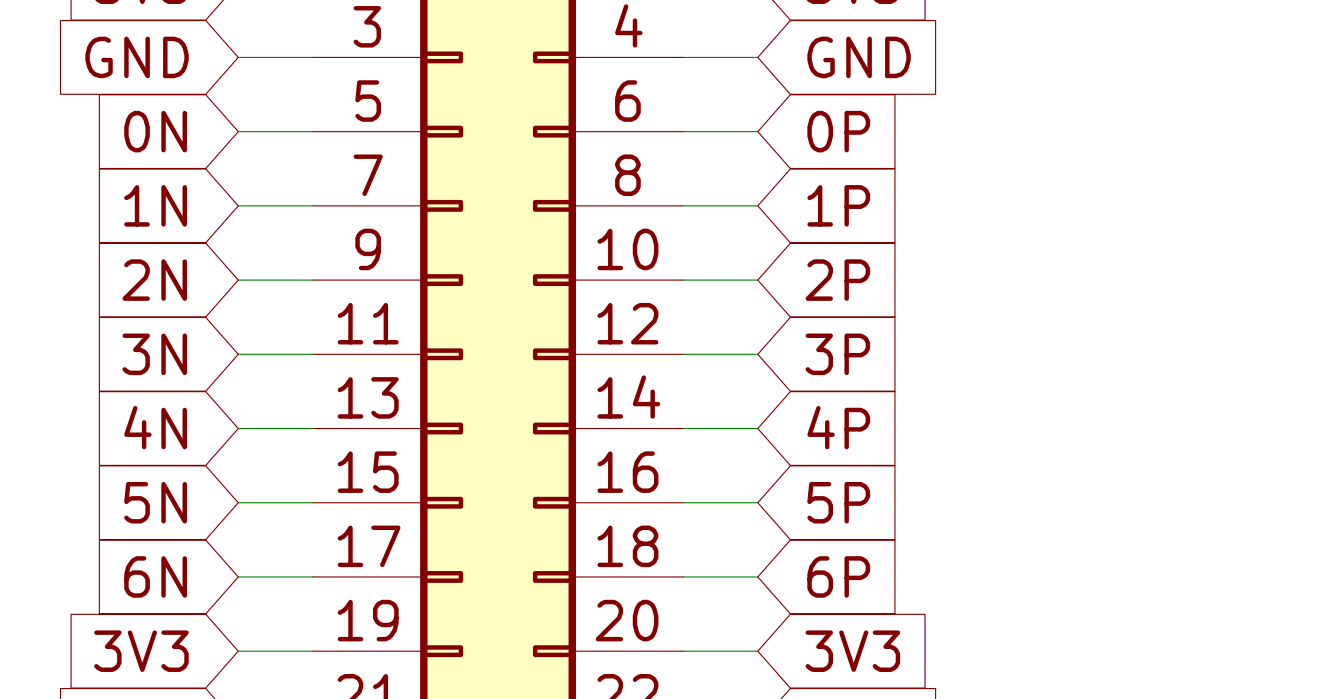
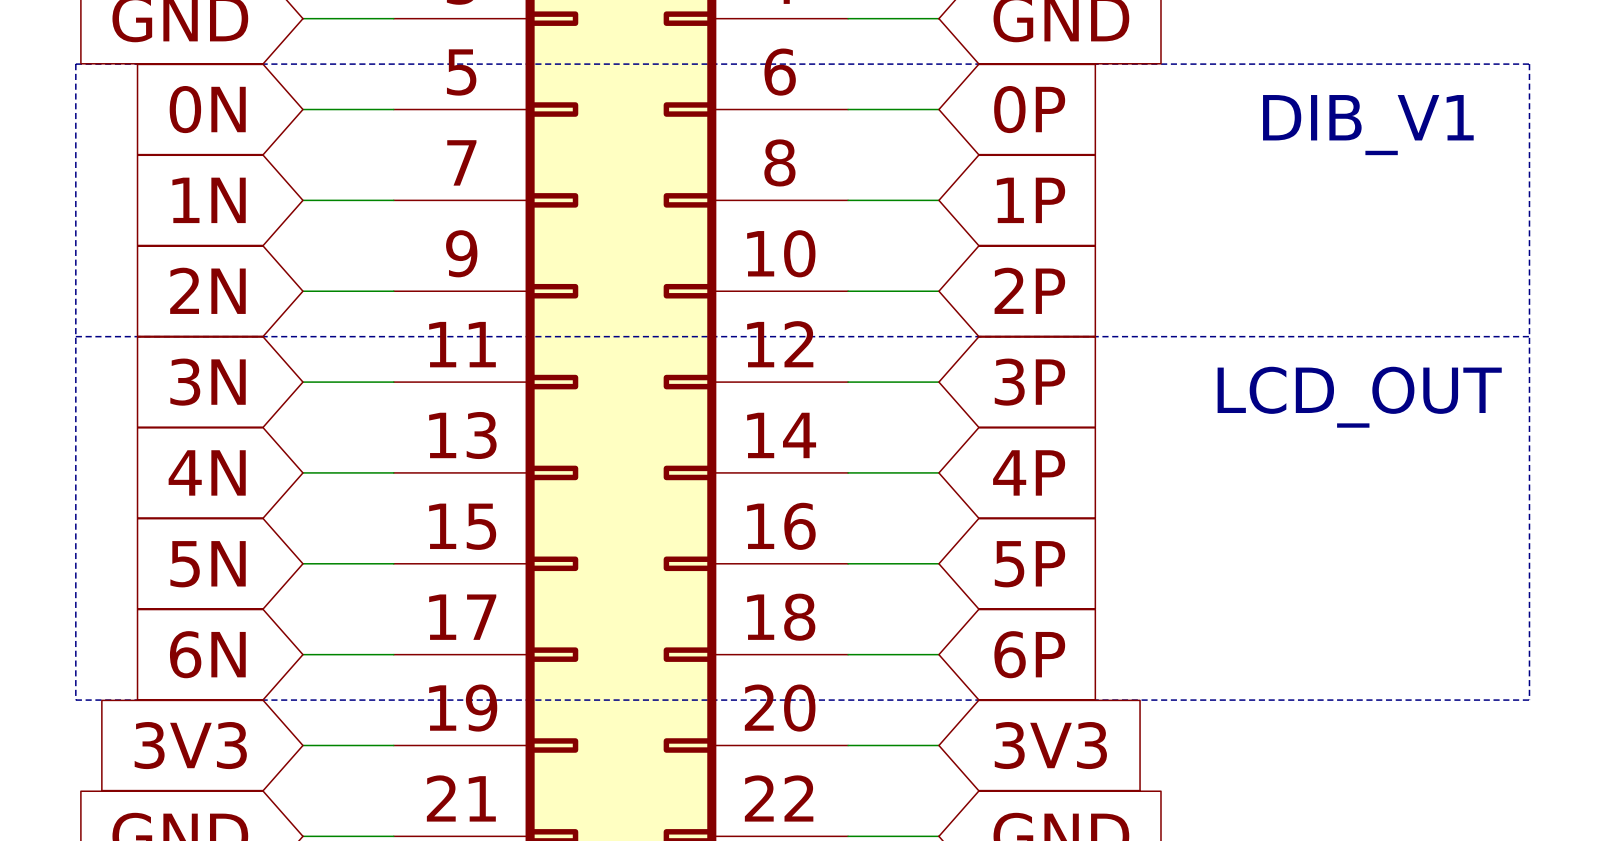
line: none -> (75, 64) (75, 700) (1529, 700) (1529, 64) (75, 64)
text: none -> DIB_V1 (1368, 125)
line: none -> (75, 336) (1529, 336)
text: none -> LCD_OUT (1359, 397)

